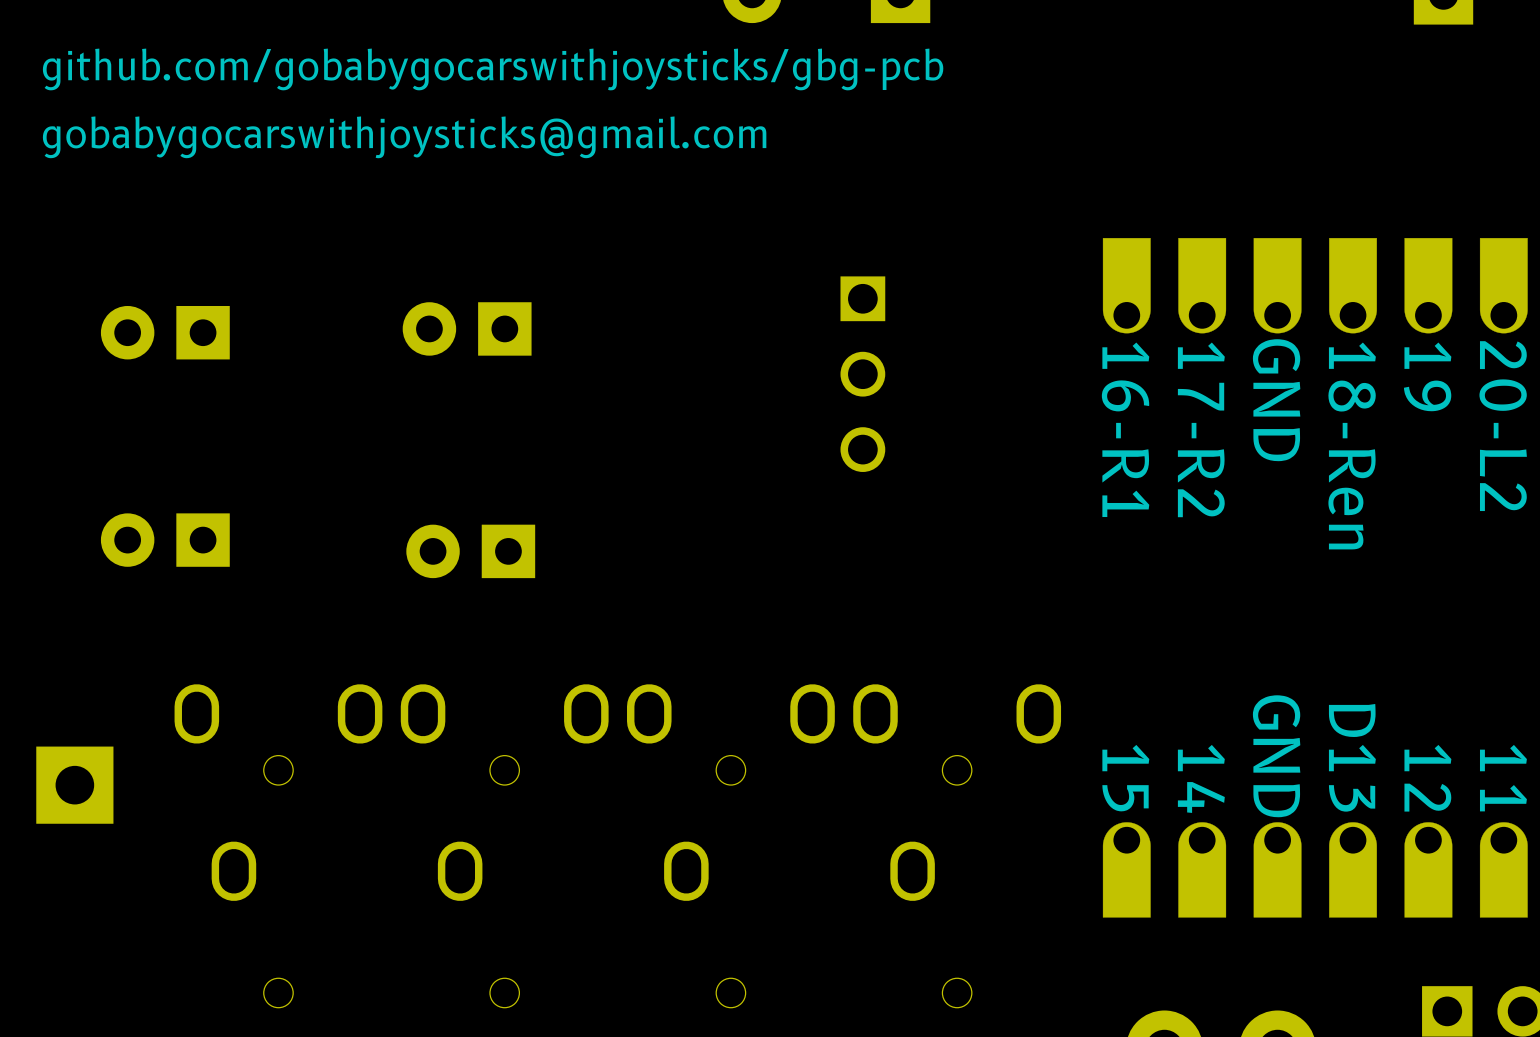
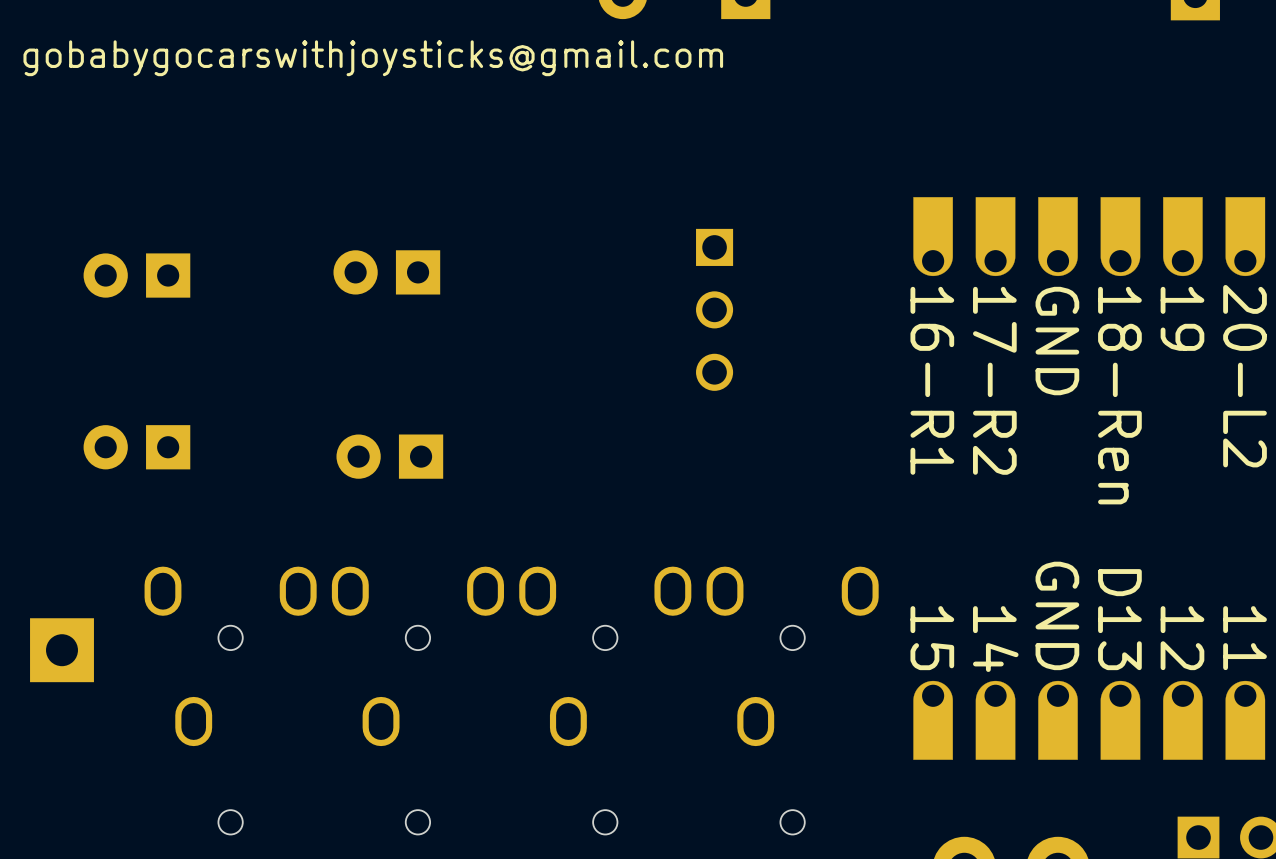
text: github.com/gobabygocarswithjoysticks/gbg-pcb (493, 69) -> gobabygocarswithjoysticks@gmail.com (373, 58)
text: gobabygocarswithjoysticks@gmail.com (404, 137) -> none

